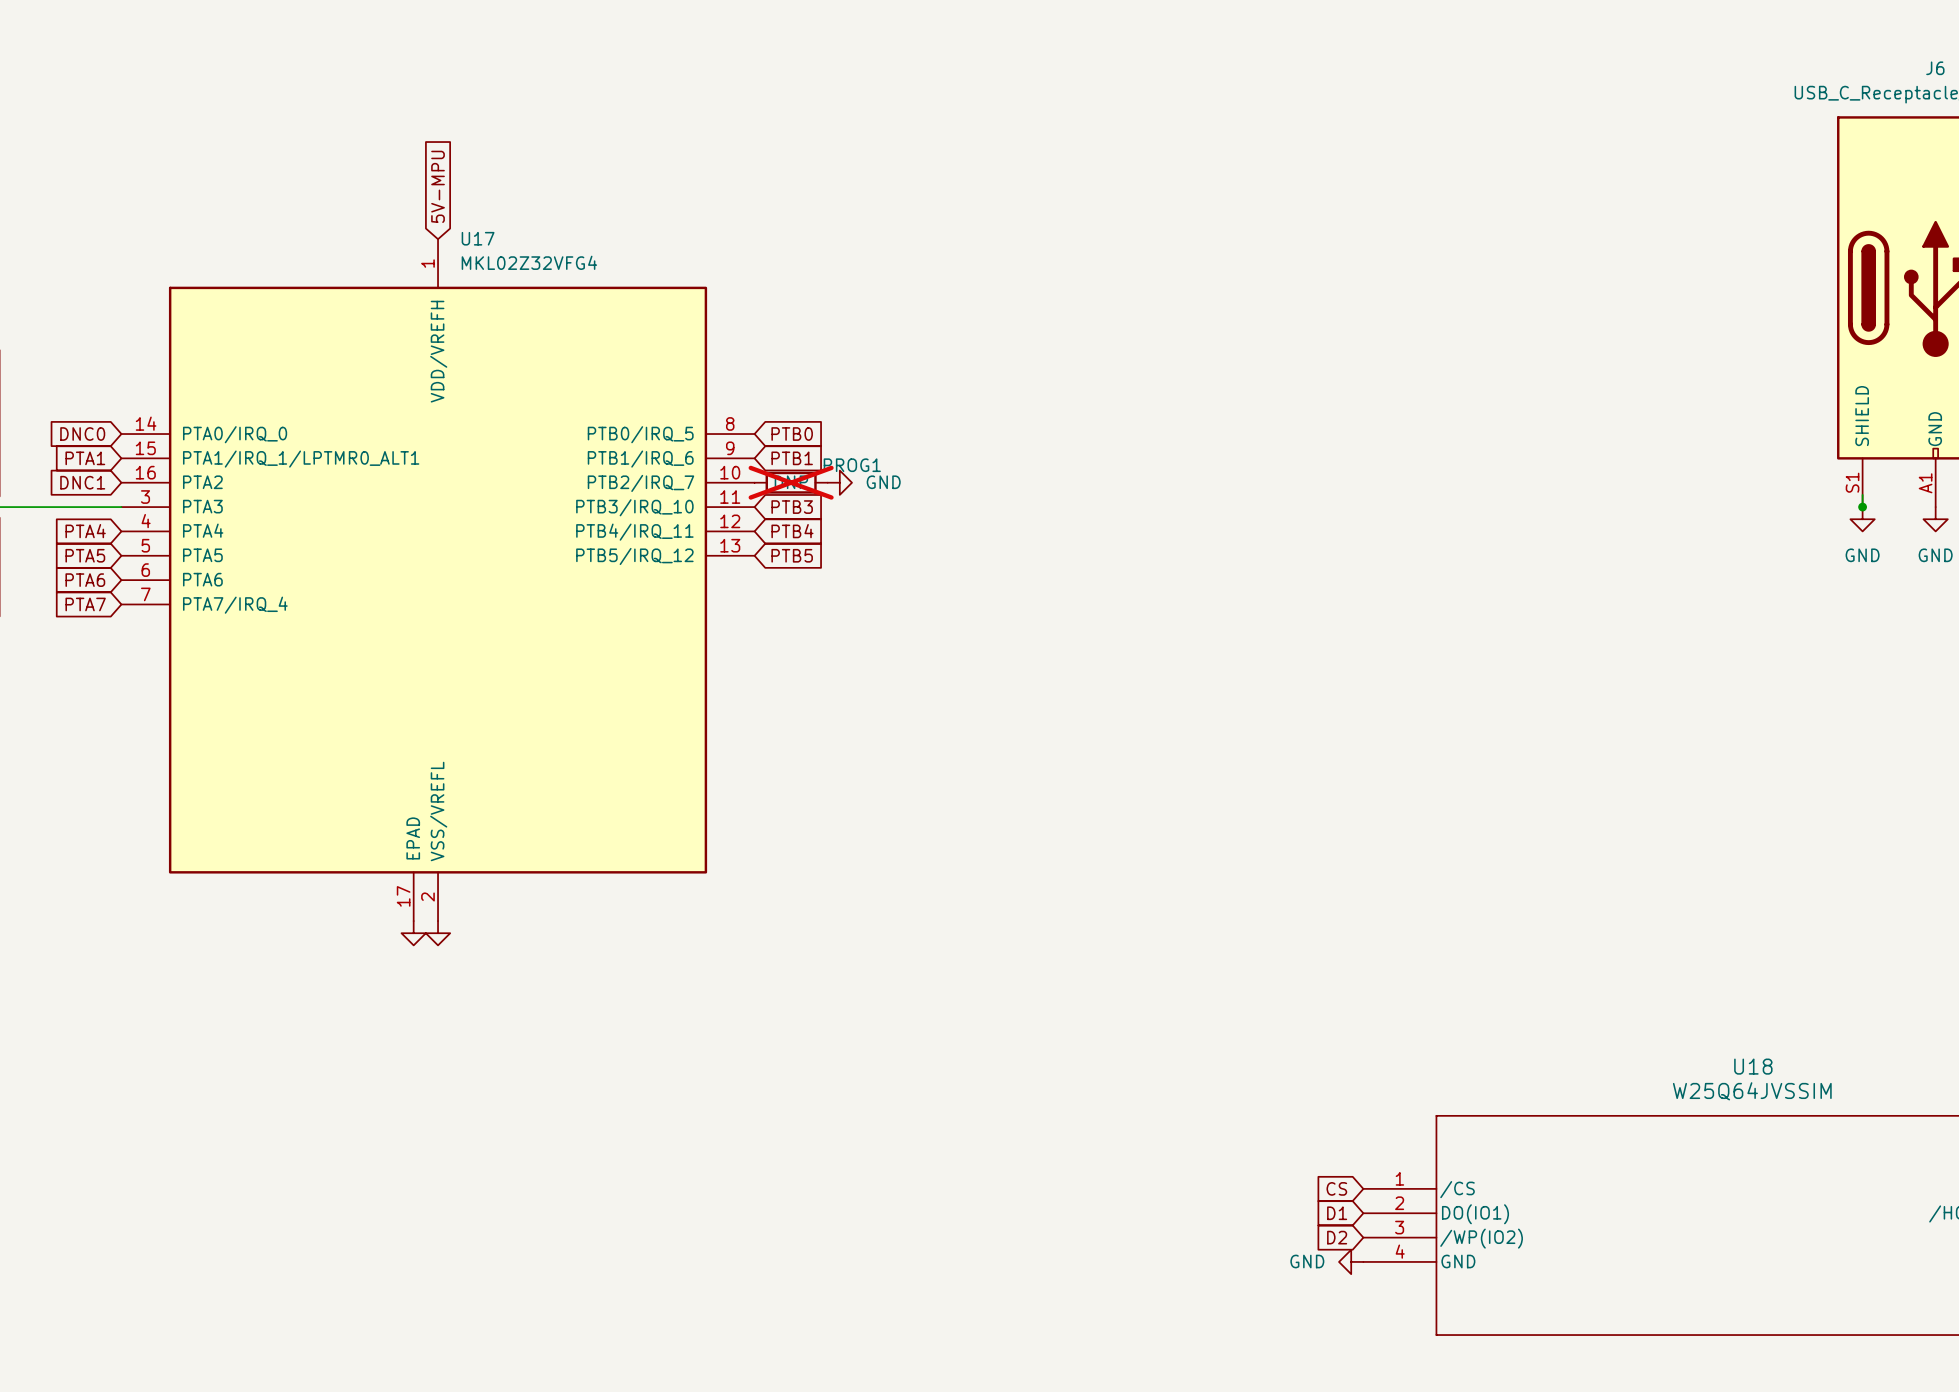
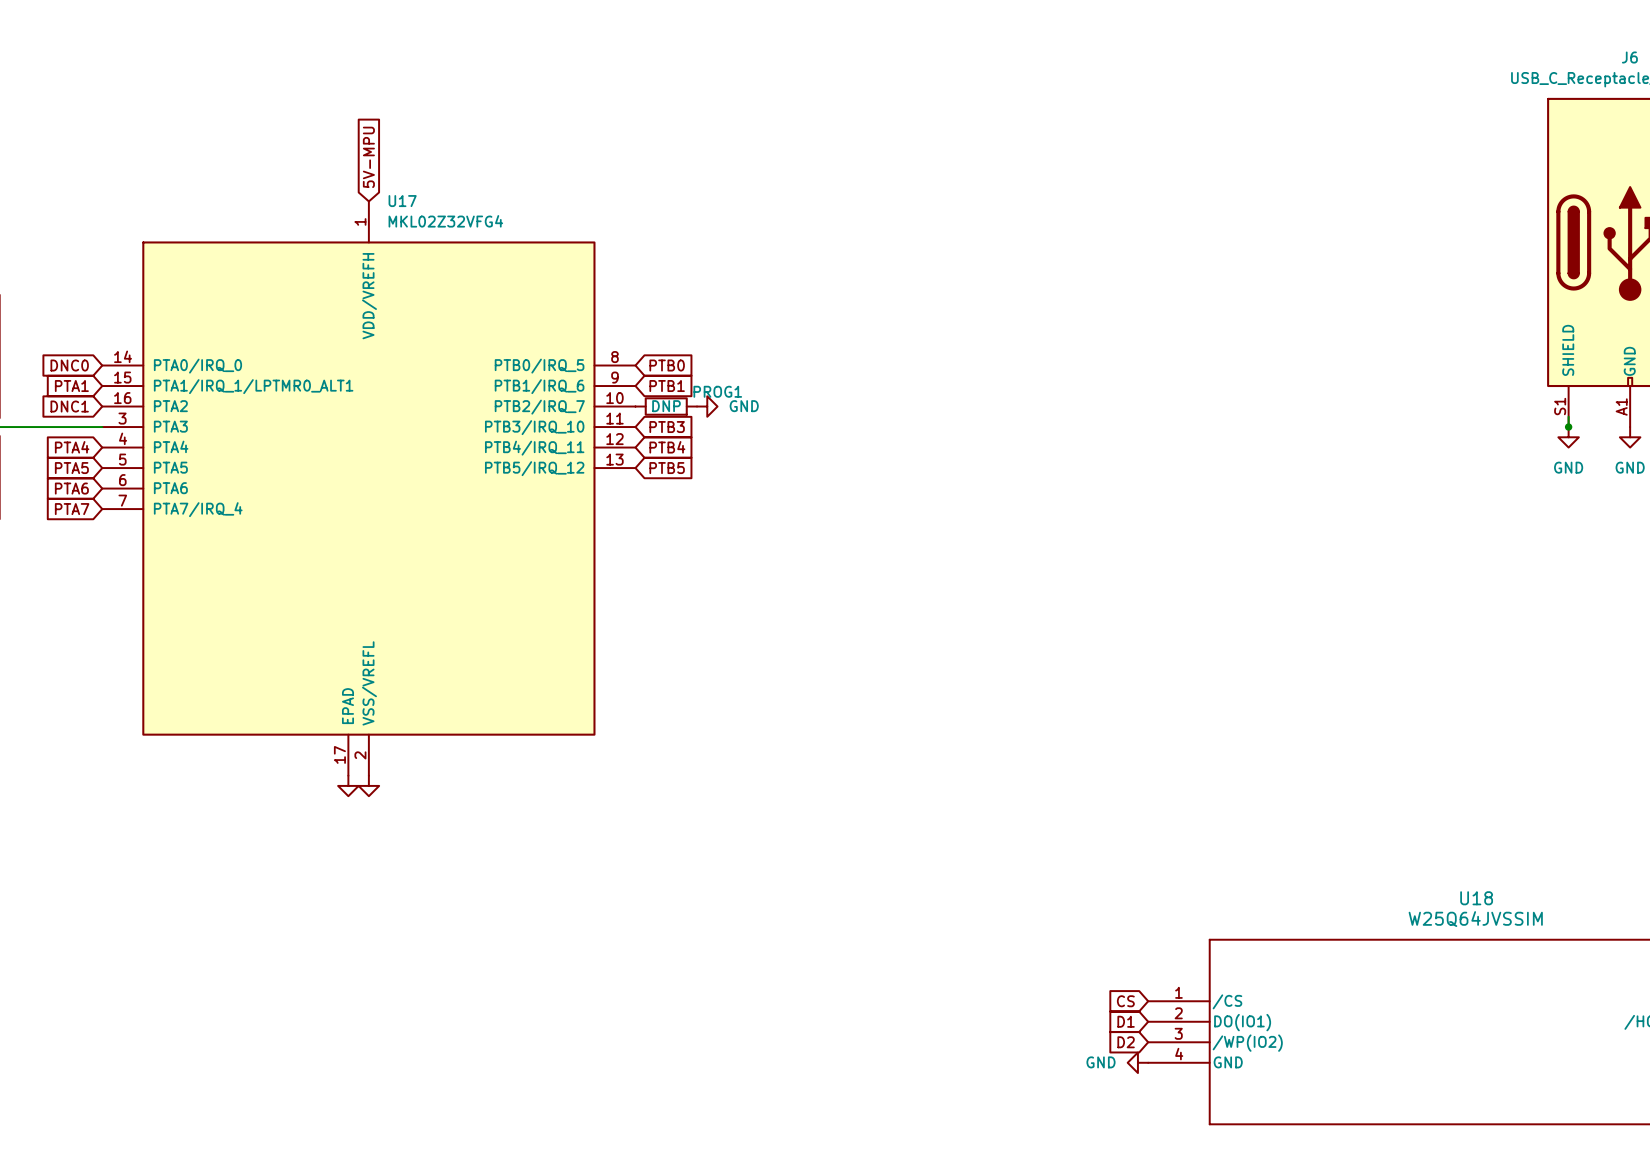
PROG1 do-not-place cross: (791, 482) -> none

